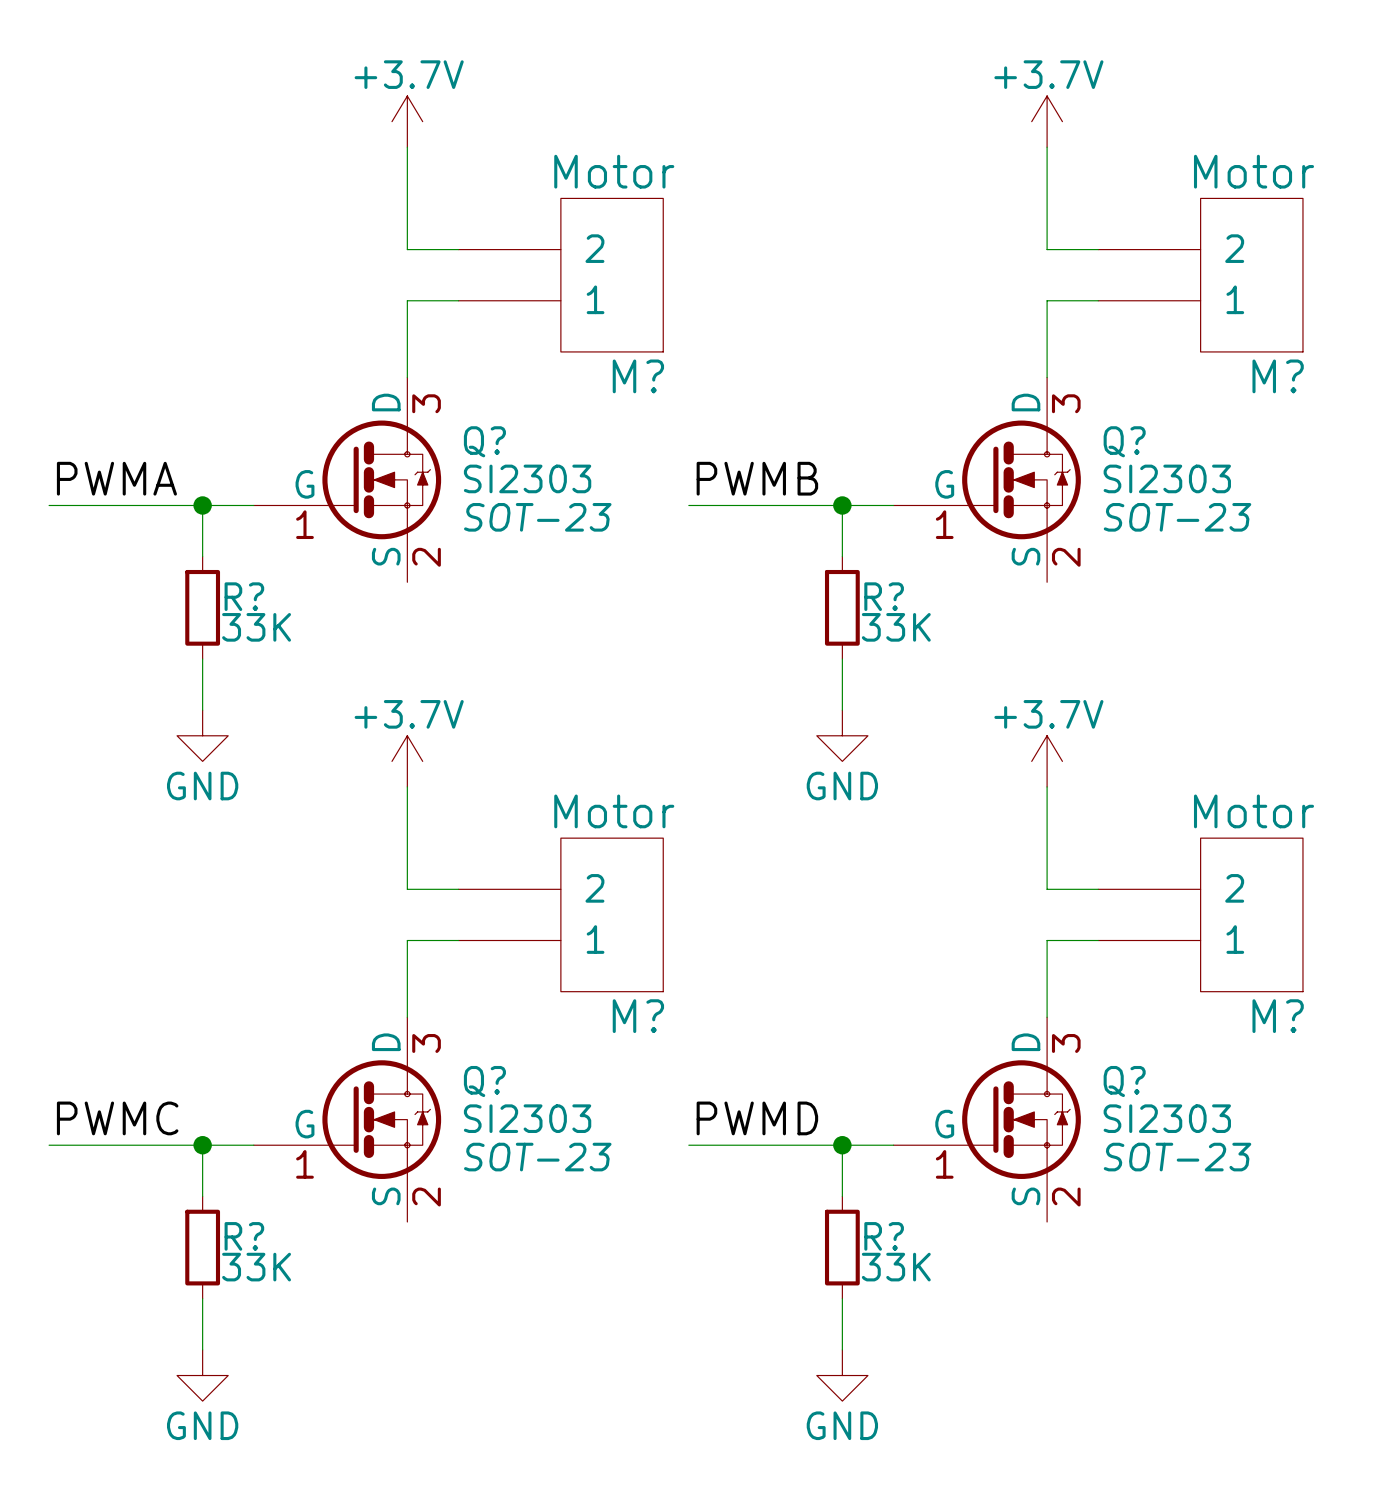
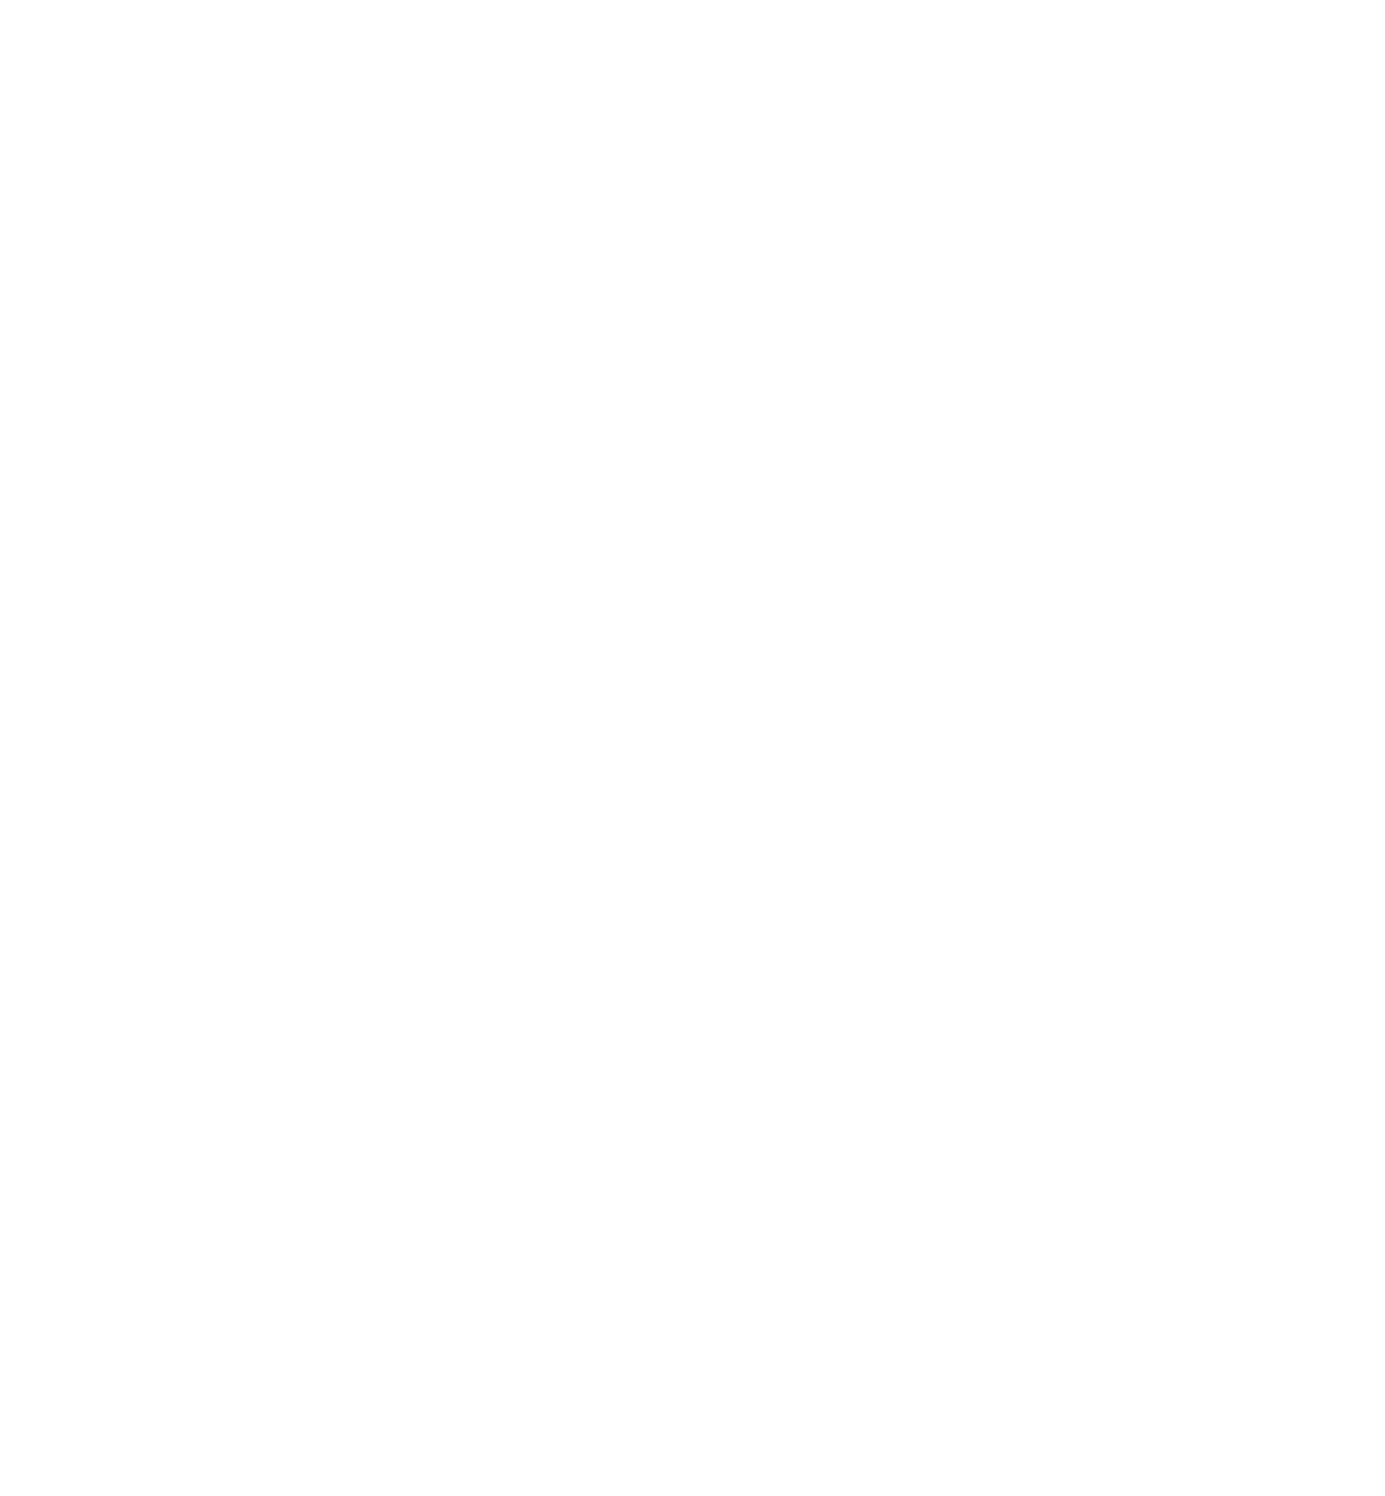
power symbol: +3.7V (407, 121) -> none
power symbol: +3.7V (1047, 121) -> none
wire: (407, 147) (407, 249) (458, 249) -> none
wire: (1047, 147) (1047, 249) (1098, 249) -> none
M?: Motor (560, 275) -> none
M?: Motor (1200, 275) -> none
wire: (458, 300) (407, 300) (407, 377) -> none
wire: (1098, 300) (1047, 300) (1047, 377) -> none
label: PWMA (116, 478) -> none
label: PWMB (757, 478) -> none
Q?: SI2303 (347, 479) -> none
Q?: SI2303 (987, 479) -> none
wire: (49, 505) (253, 505) -> none
wire: (202, 505) (202, 556) -> none
junction: (202, 505) -> none
wire: (688, 505) (893, 505) -> none
wire: (842, 505) (842, 556) -> none
junction: (842, 505) -> none
R?: 33K (202, 607) -> none
R?: 33K (842, 607) -> none
wire: (202, 659) (202, 710) -> none
wire: (842, 659) (842, 710) -> none
power symbol: GND (202, 735) -> none
power symbol: GND (842, 735) -> none
power symbol: +3.7V (407, 761) -> none
power symbol: +3.7V (1047, 761) -> none
wire: (407, 786) (407, 889) (458, 889) -> none
wire: (1047, 786) (1047, 889) (1098, 889) -> none
M?: Motor (560, 914) -> none
M?: Motor (1200, 914) -> none
wire: (458, 940) (407, 940) (407, 1017) -> none
wire: (1098, 940) (1047, 940) (1047, 1017) -> none
label: PWMC (117, 1118) -> none
label: PWMD (757, 1118) -> none
Q?: SI2303 (347, 1119) -> none
Q?: SI2303 (987, 1119) -> none
wire: (49, 1145) (253, 1145) -> none
wire: (202, 1145) (202, 1196) -> none
junction: (202, 1145) -> none
wire: (688, 1145) (893, 1145) -> none
wire: (842, 1145) (842, 1196) -> none
junction: (842, 1145) -> none
R?: 33K (202, 1247) -> none
R?: 33K (842, 1247) -> none
wire: (202, 1298) (202, 1349) -> none
wire: (842, 1298) (842, 1349) -> none
power symbol: GND (202, 1375) -> none
power symbol: GND (842, 1375) -> none

